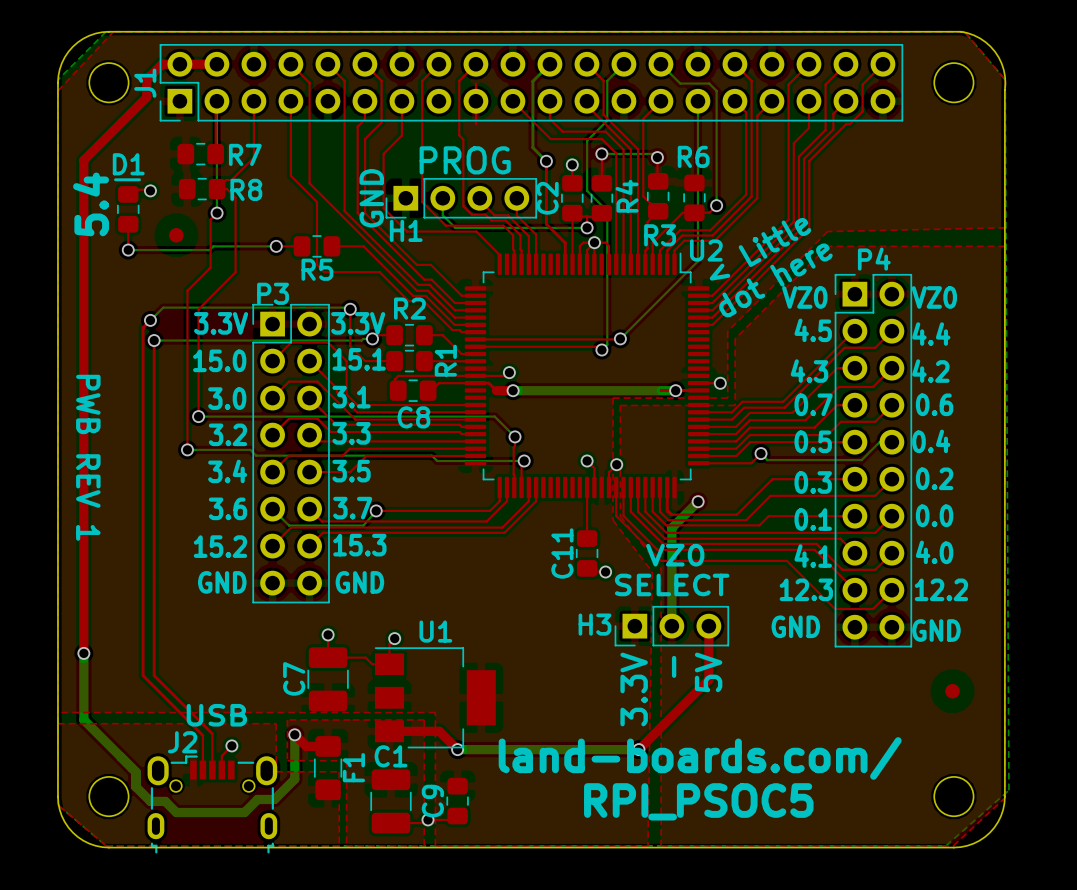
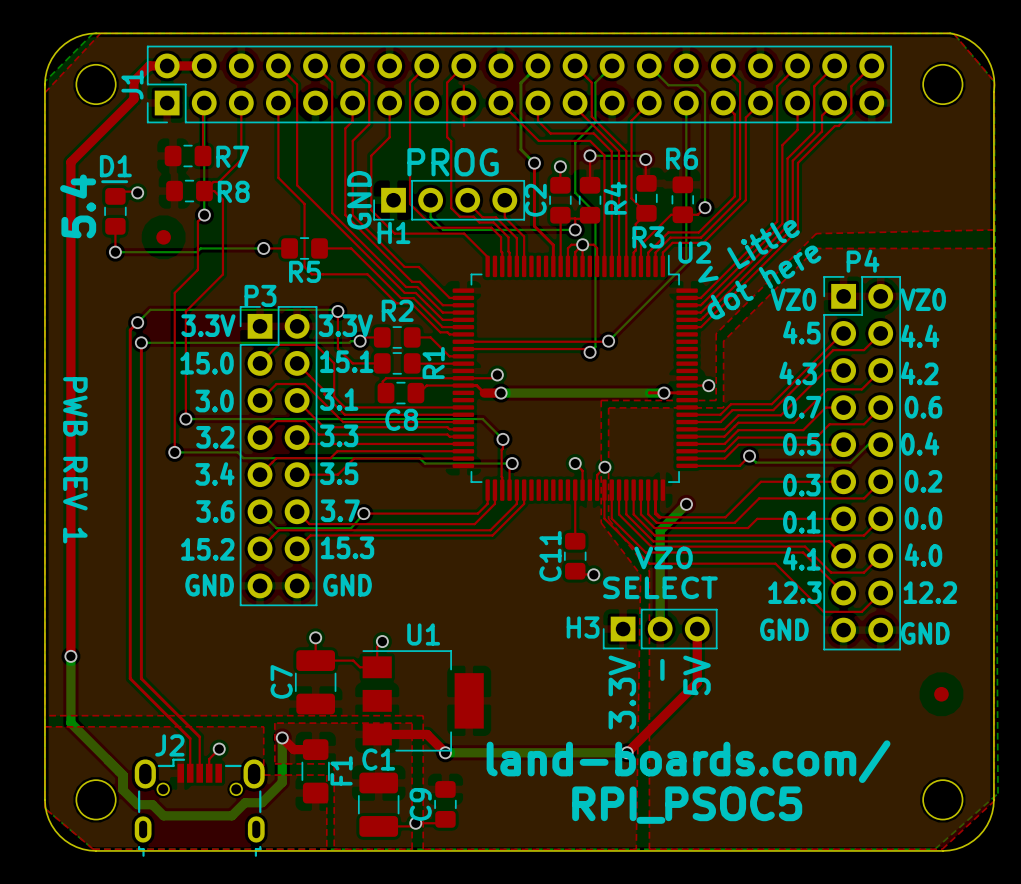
text: USB (216, 715) -> none

